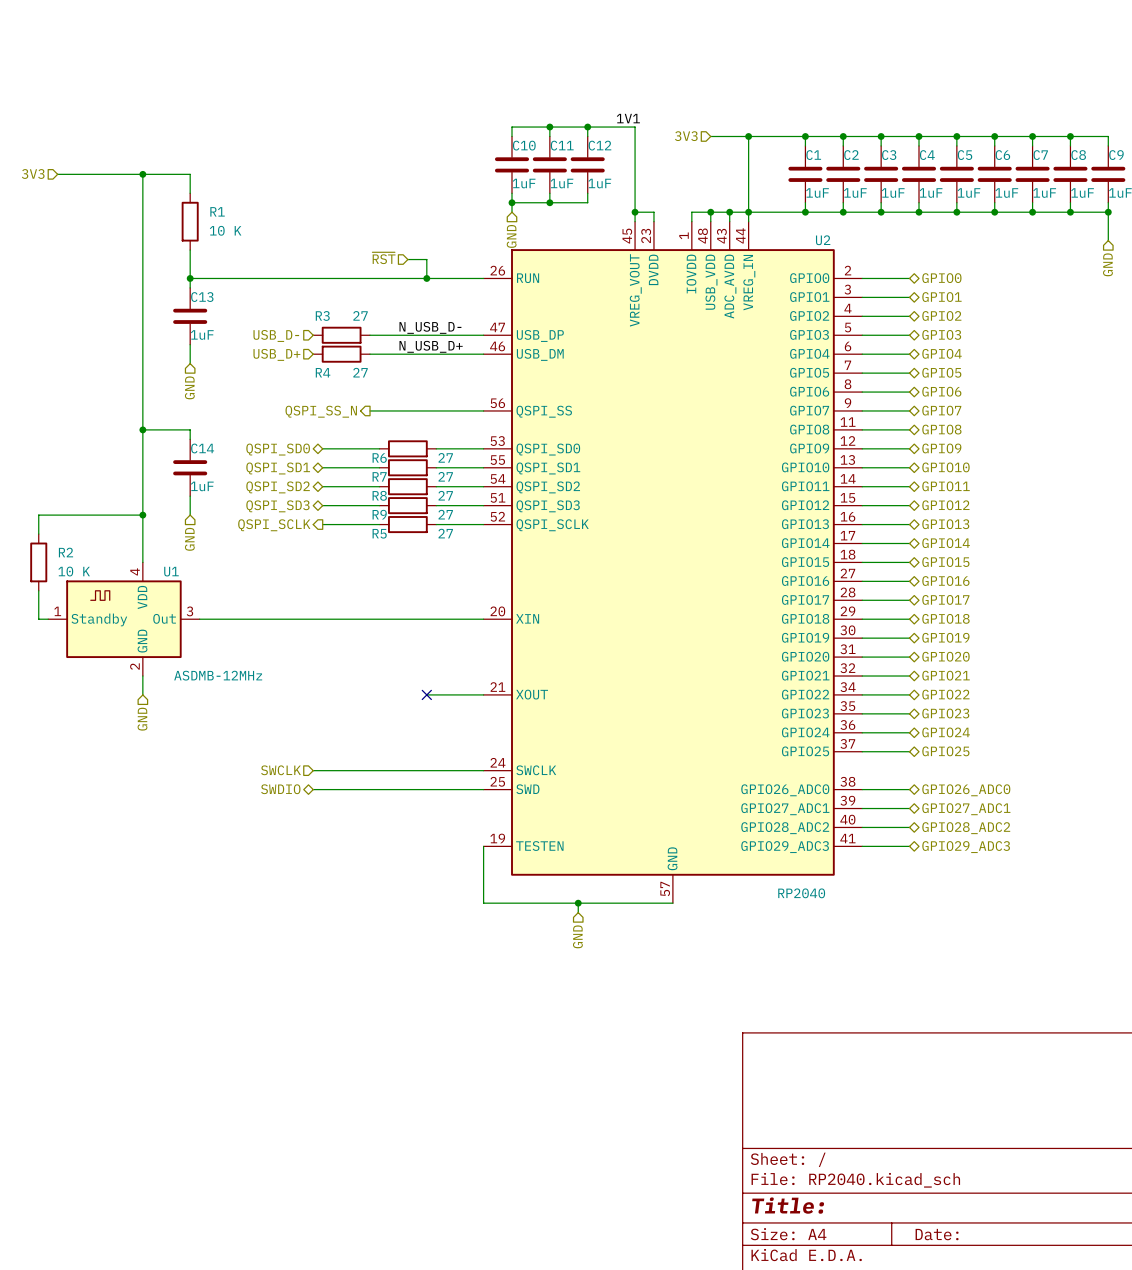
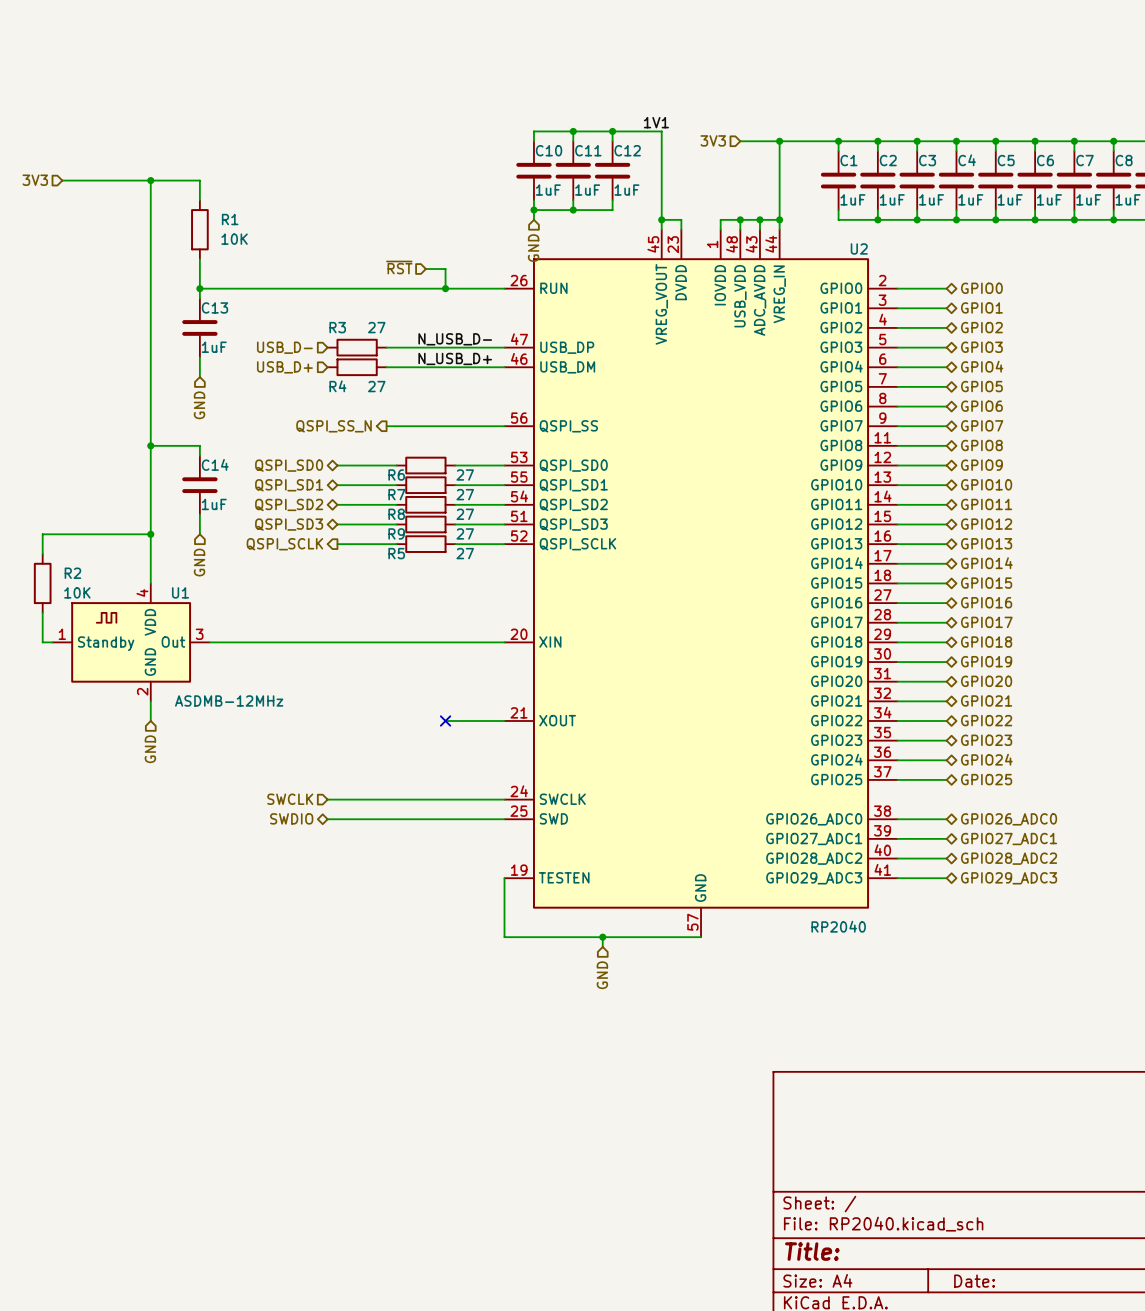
wire: (748, 212) (805, 212) -> none
junction: (805, 212) -> none
R1 value: 10 K (225, 230) -> 10K (234, 239)
R2 value: 10 K (74, 571) -> 10K (77, 592)

